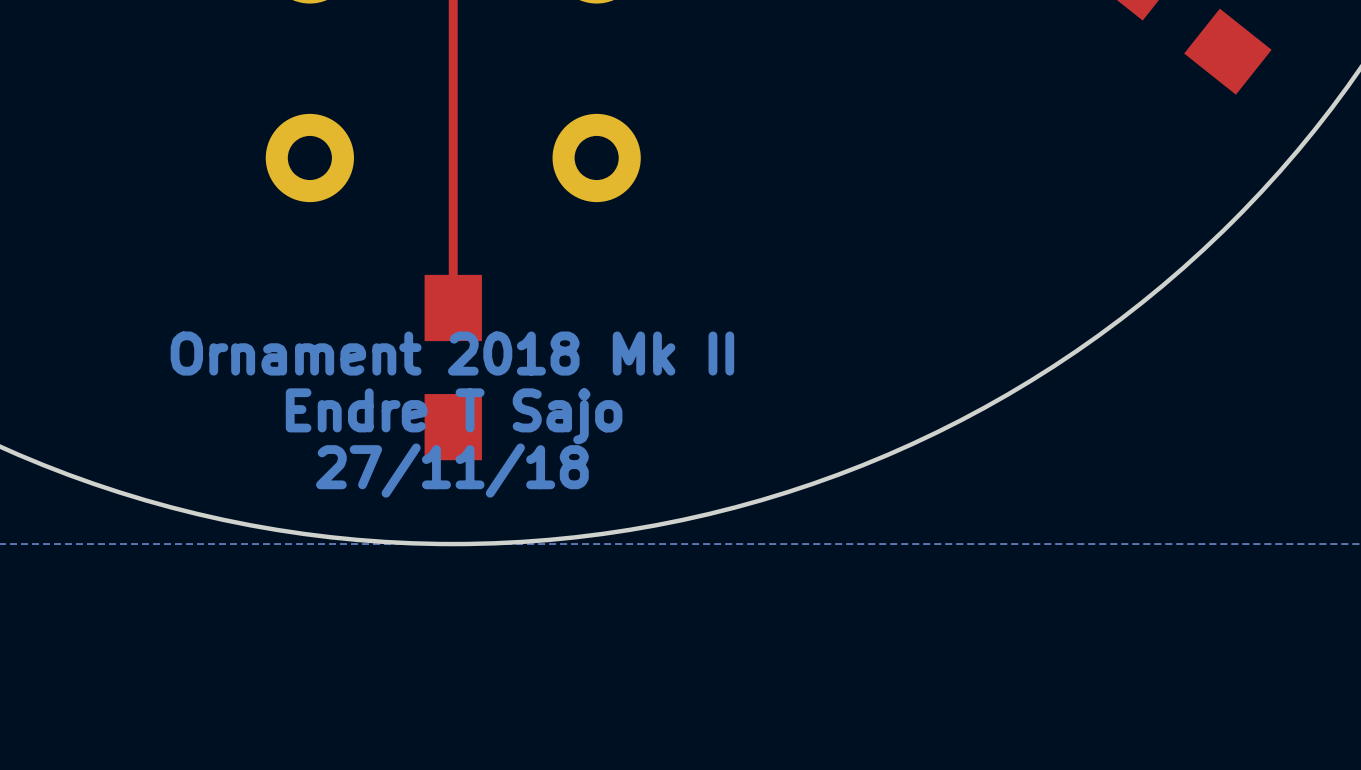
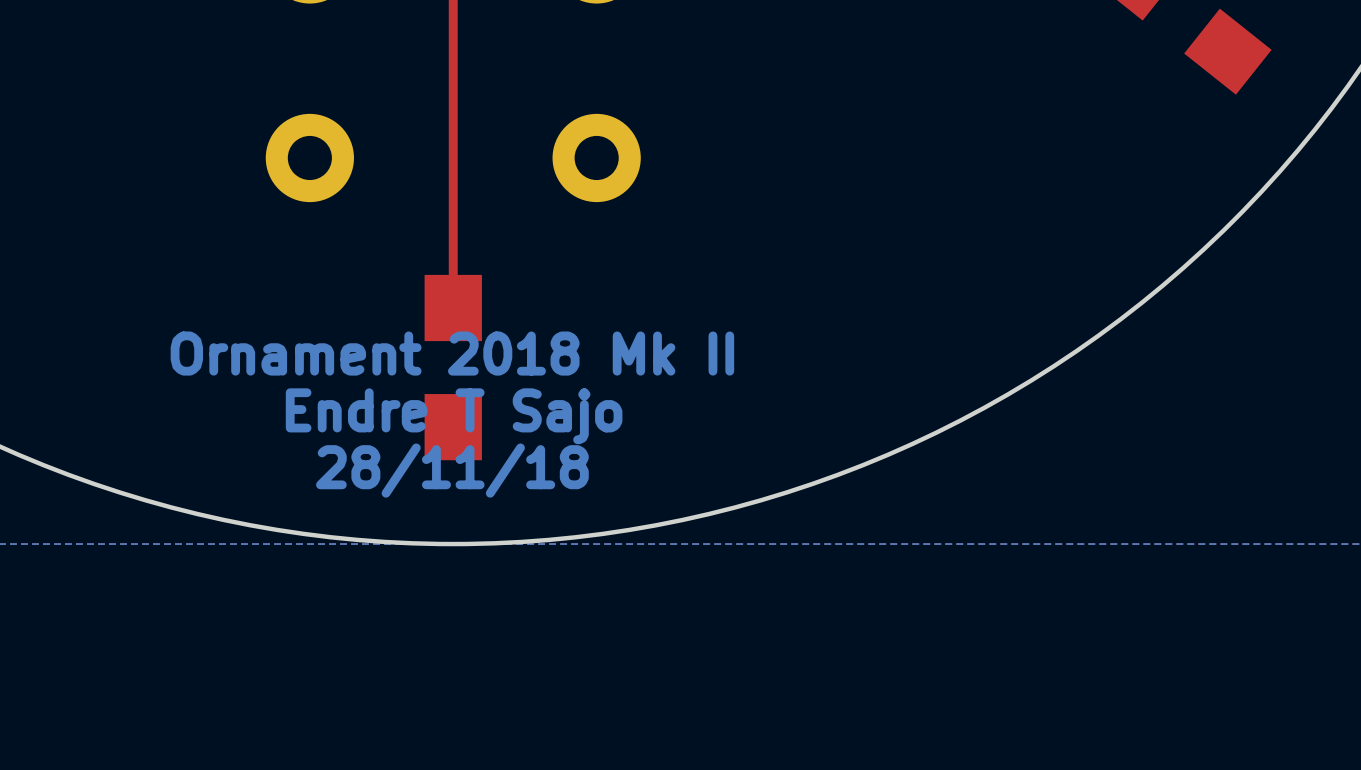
text: 27/11/18 (452, 470) -> 28/11/18 (452, 470)

